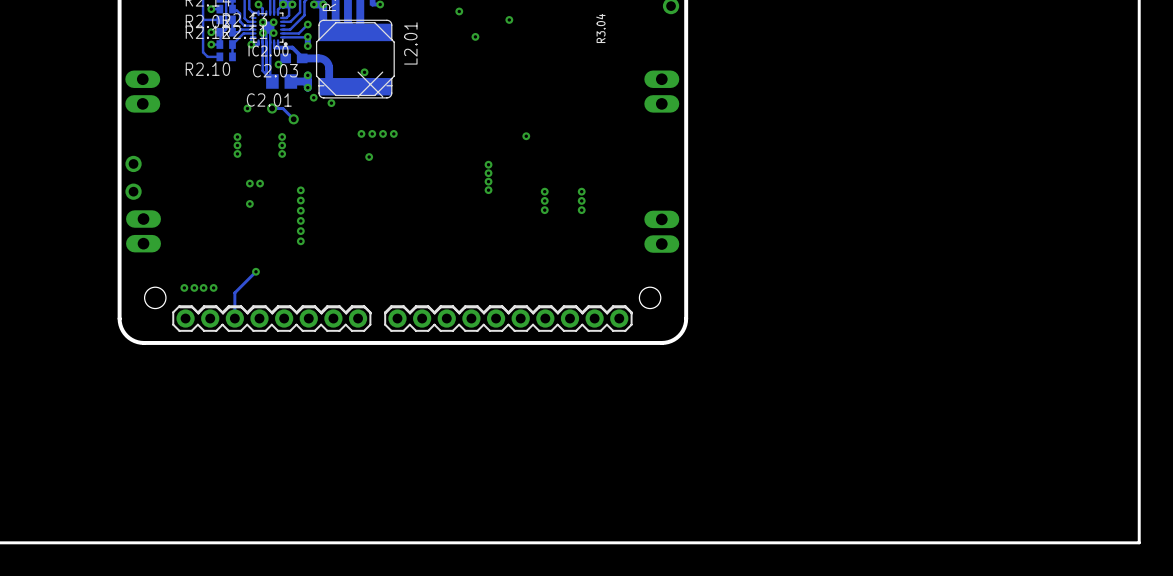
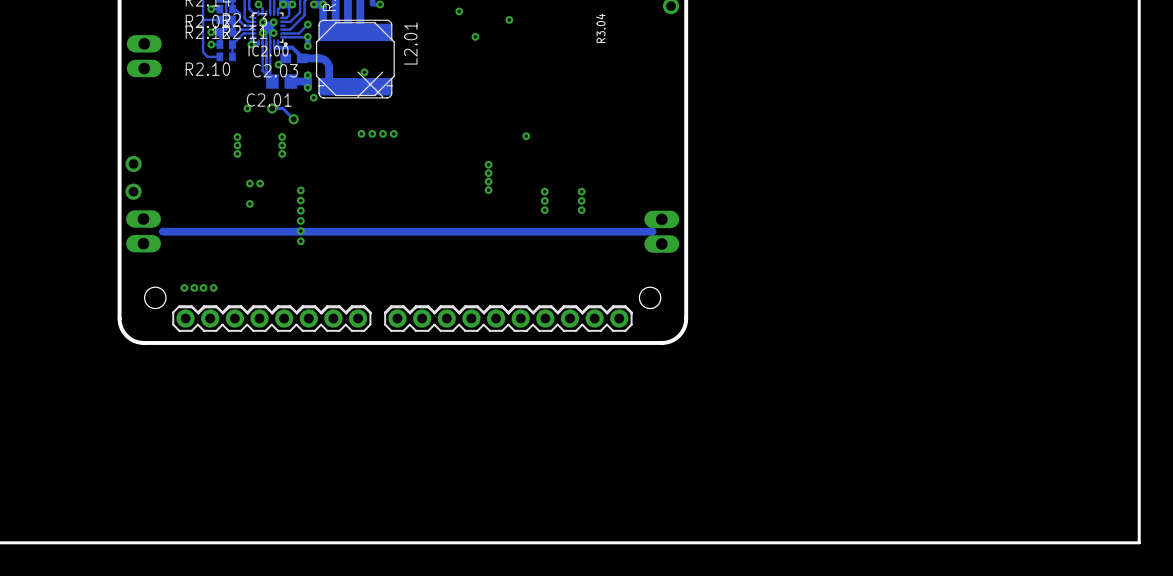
part position: (142, 91) -> (144, 56)
part: (661, 91) -> none
via: (331, 103) -> none
via: (369, 157) -> none
track: none -> (652, 231) (162, 231)
track: (255, 271) (234, 292) (234, 318) -> none
via: (255, 271) -> none

